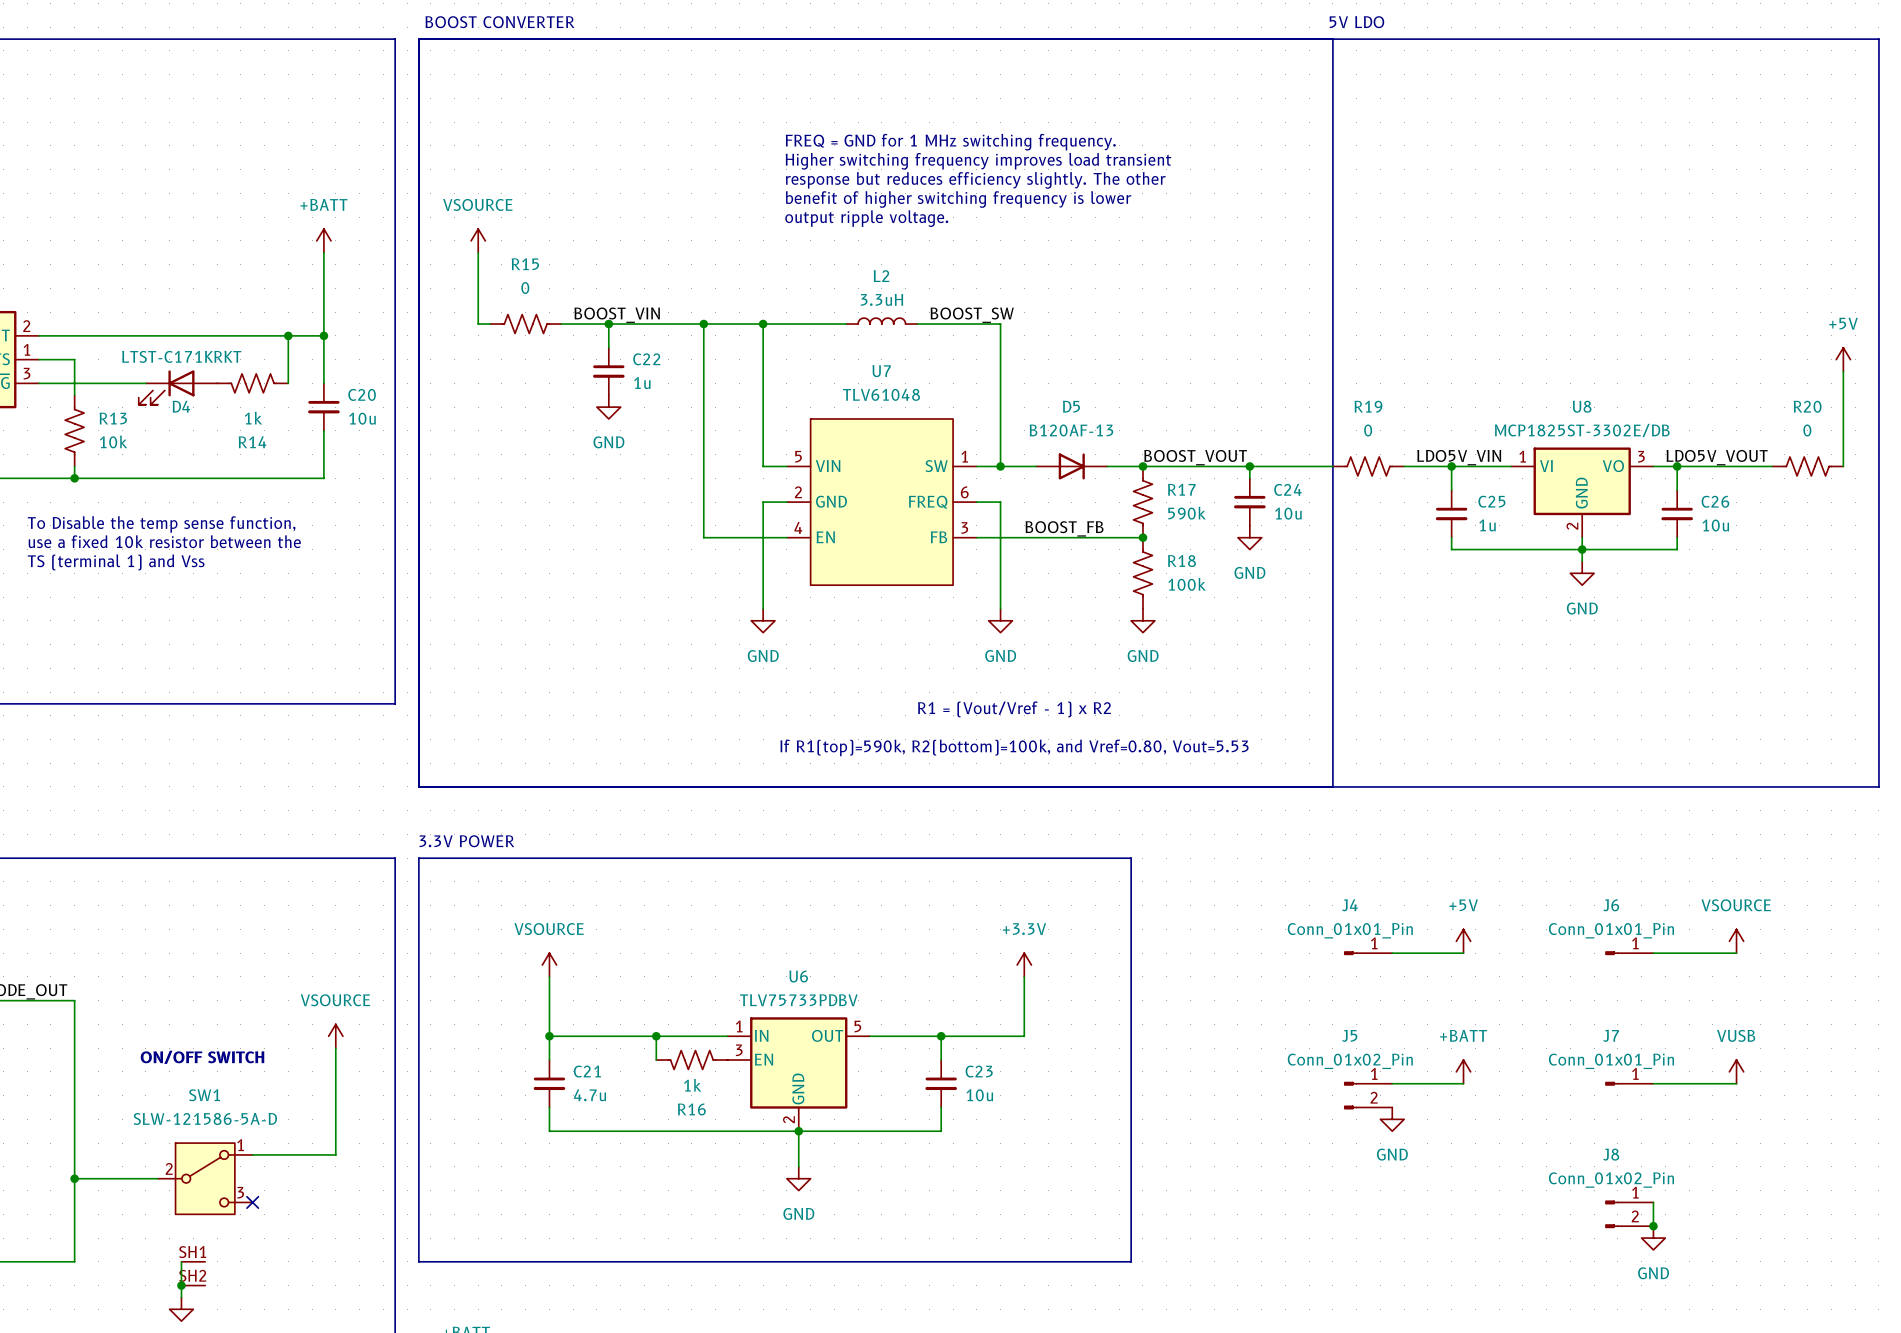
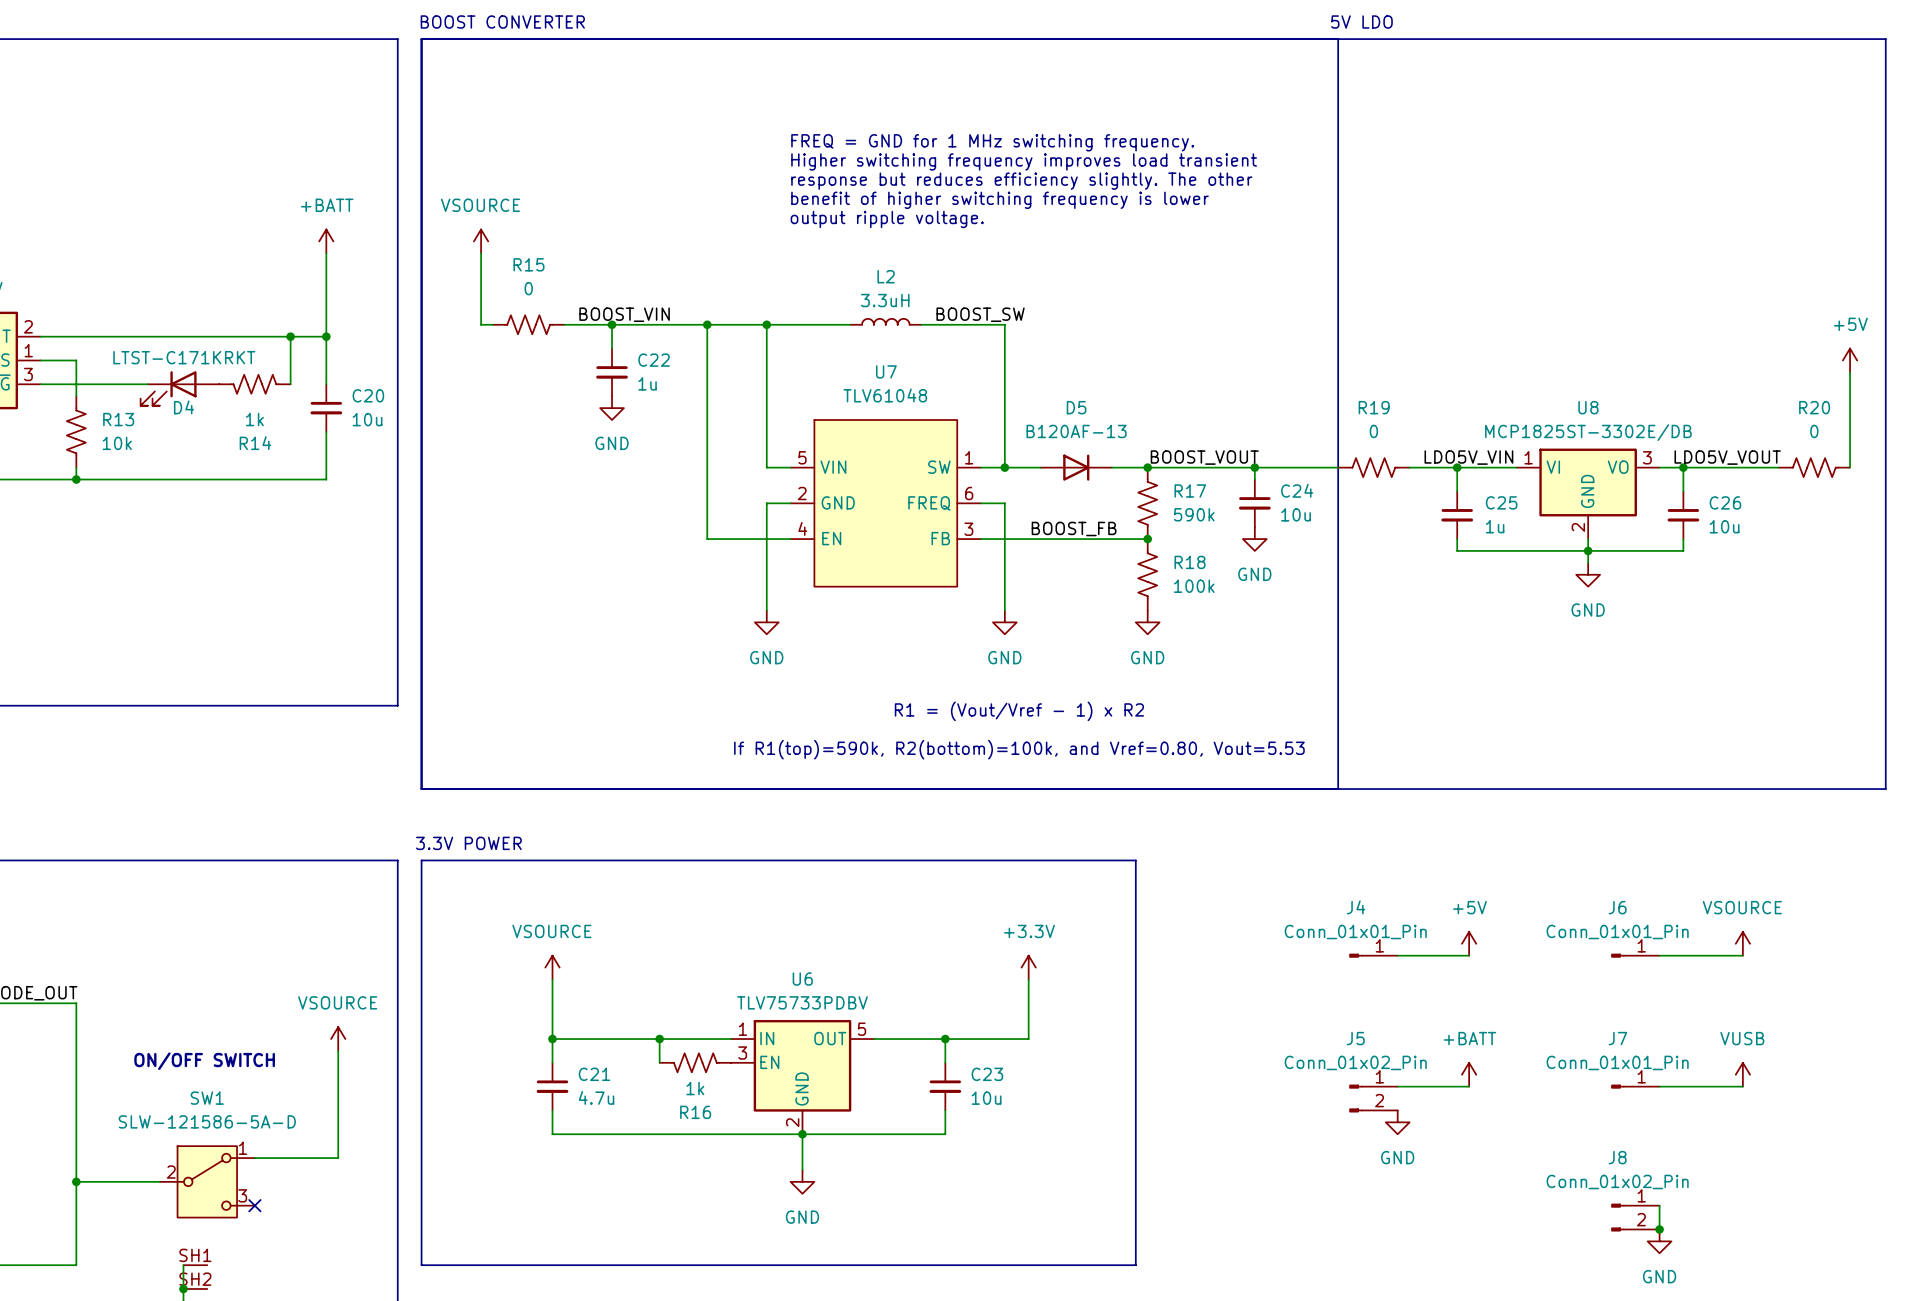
text: To Disable the temp sense function, (161, 524) -> none
text: use a fixed 10k resistor between the (164, 541) -> none
text: TS (terminal 1) and Vss (116, 562) -> none

